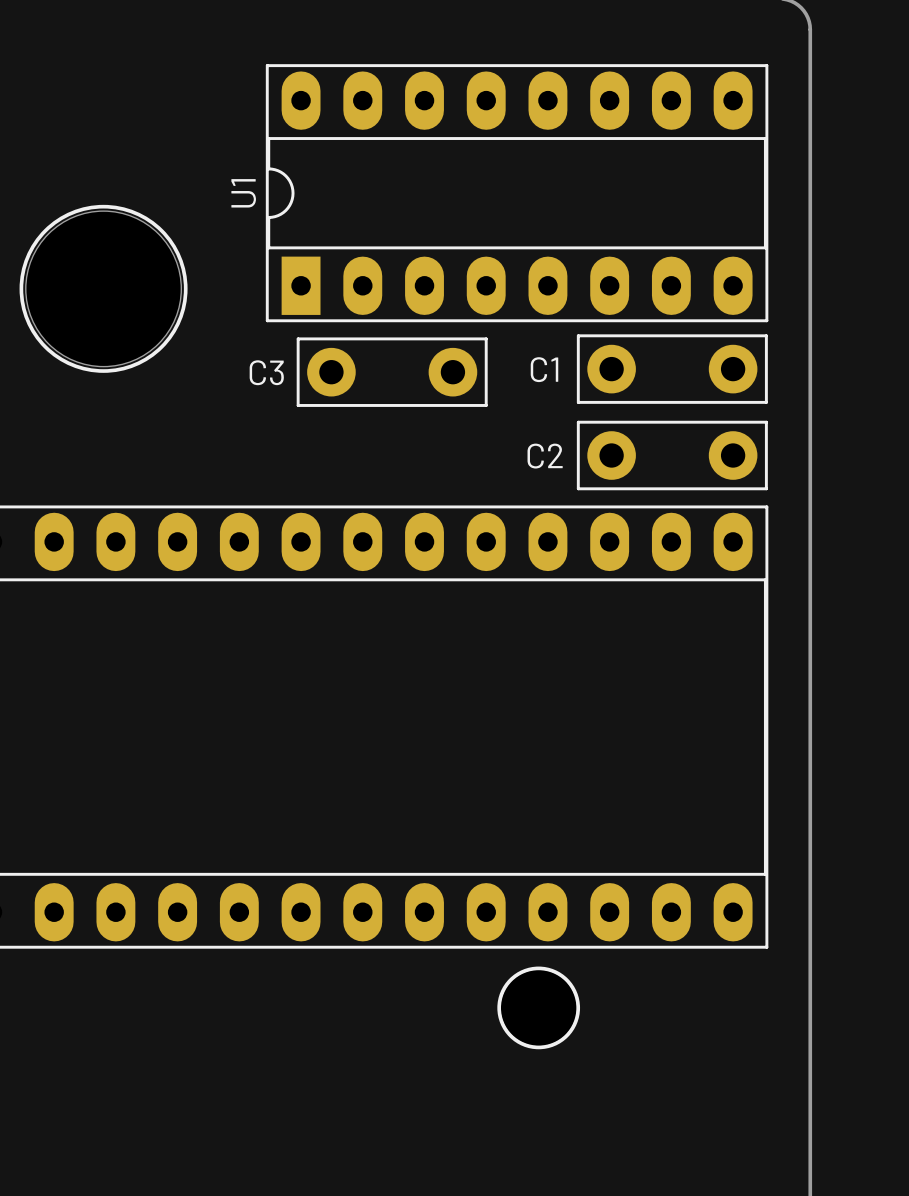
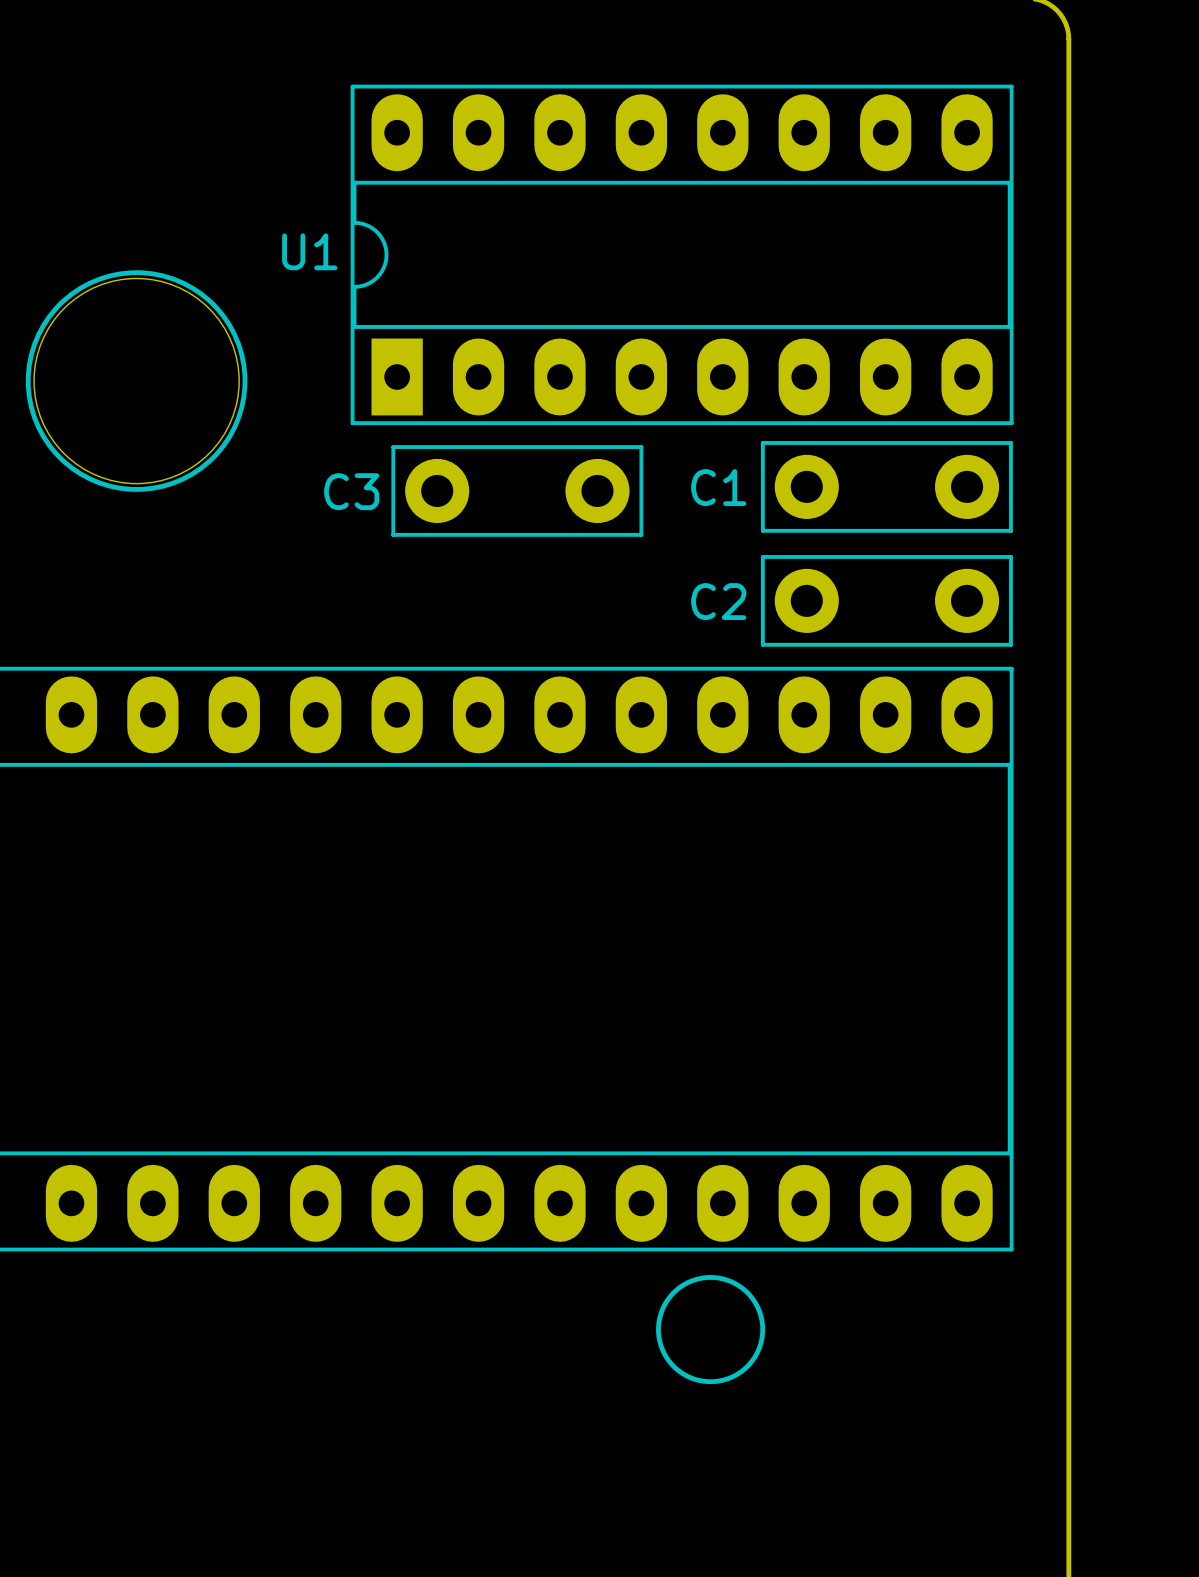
U1 name rotation: 0° (243, 193) -> 90° clockwise (309, 251)

